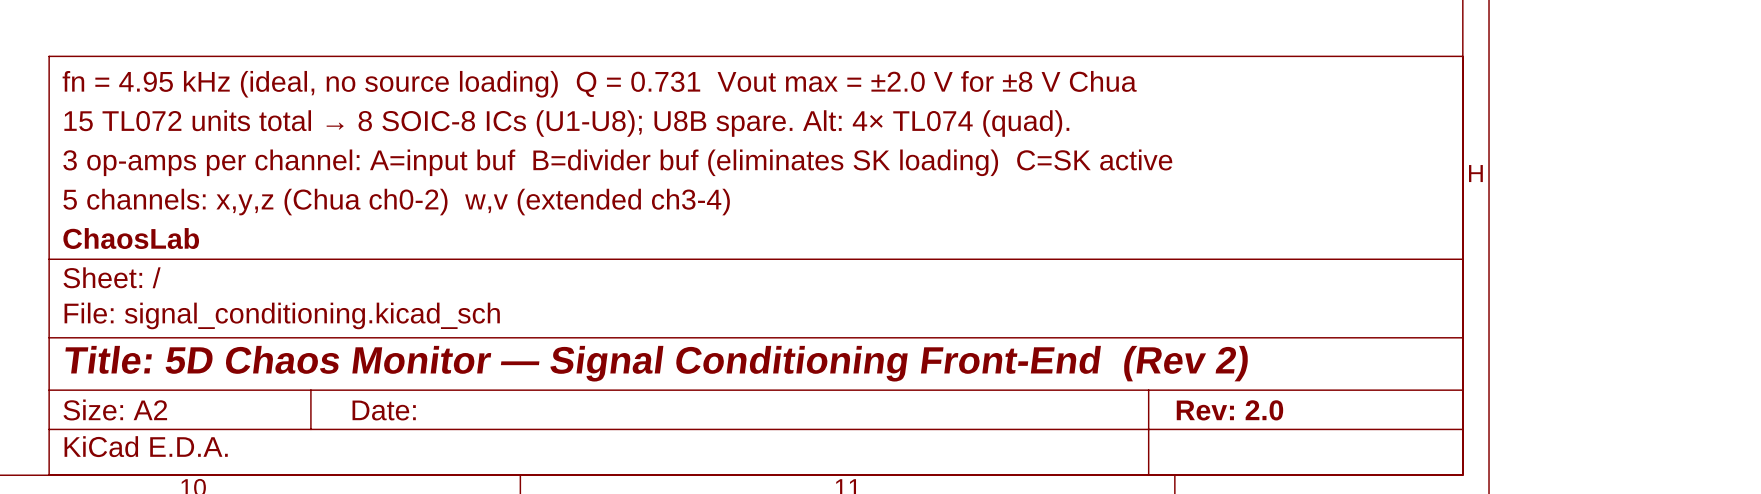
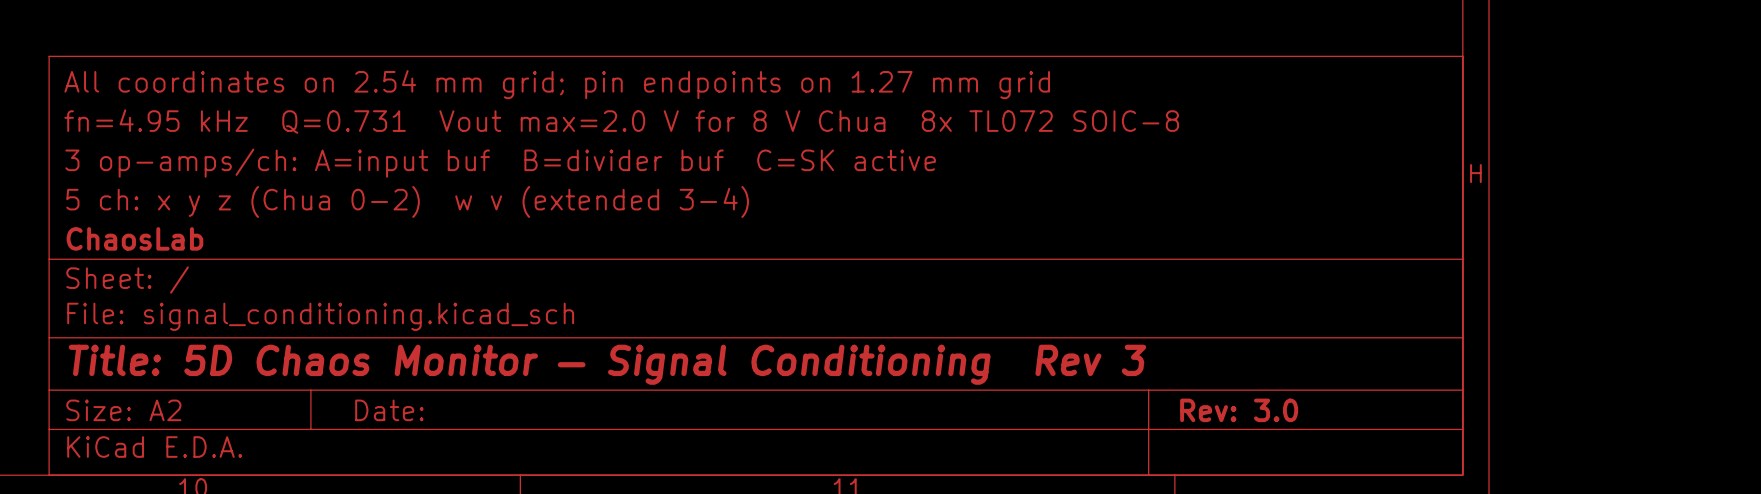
title block: fn = 4.95 kHz (ideal, no source loading) Q = 0.731 Vout max = ±2.0 V for ±8 V Chua (599, 84) -> All coordinates on 2.54 mm grid; pin endpoints on 1.27 mm grid (557, 84)
title block: 15 TL072 units total → 8 SOIC-8 ICs (U1-U8); U8B spare. Alt: 4× TL074 (quad). (566, 123) -> fn=4.95 kHz Q=0.731 Vout max=2.0 V for 8 V Chua 8x TL072 SOIC-8 (621, 121)
title block: 3 op-amps per channel: A=input buf B=divider buf (eliminates SK loading) C=SK active (617, 162) -> 3 op-amps/ch: A=input buf B=divider buf C=SK active (500, 163)
title block: 5 channels: x,y,z (Chua ch0-2) w,v (extended ch3-4) (396, 202) -> 5 ch: x y z (Chua 0-2) w v (extended 3-4) (407, 201)
title block: Title: 5D Chaos Monitor — Signal Conditioning Front-End (Rev 2) (656, 363) -> Title: 5D Chaos Monitor — Signal Conditioning Rev 3 (607, 364)
title block: Rev: 2.0 (1229, 410) -> Rev: 3.0 (1239, 410)

